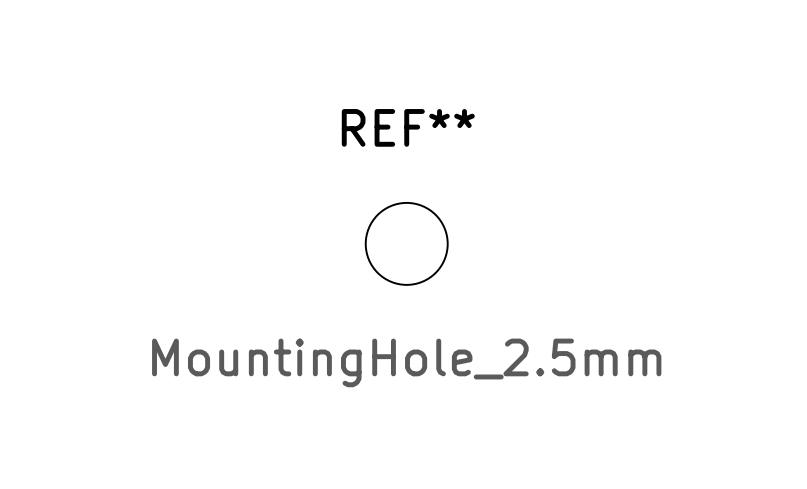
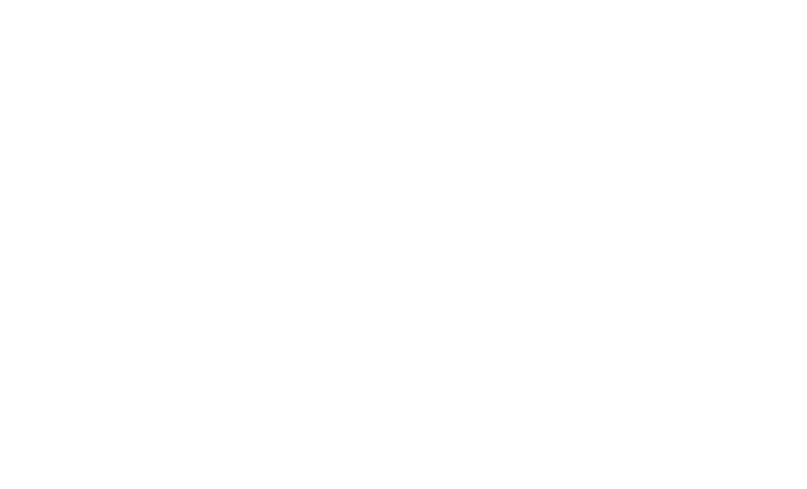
REF**: MountingHole_2.5mm (406, 243) -> none

